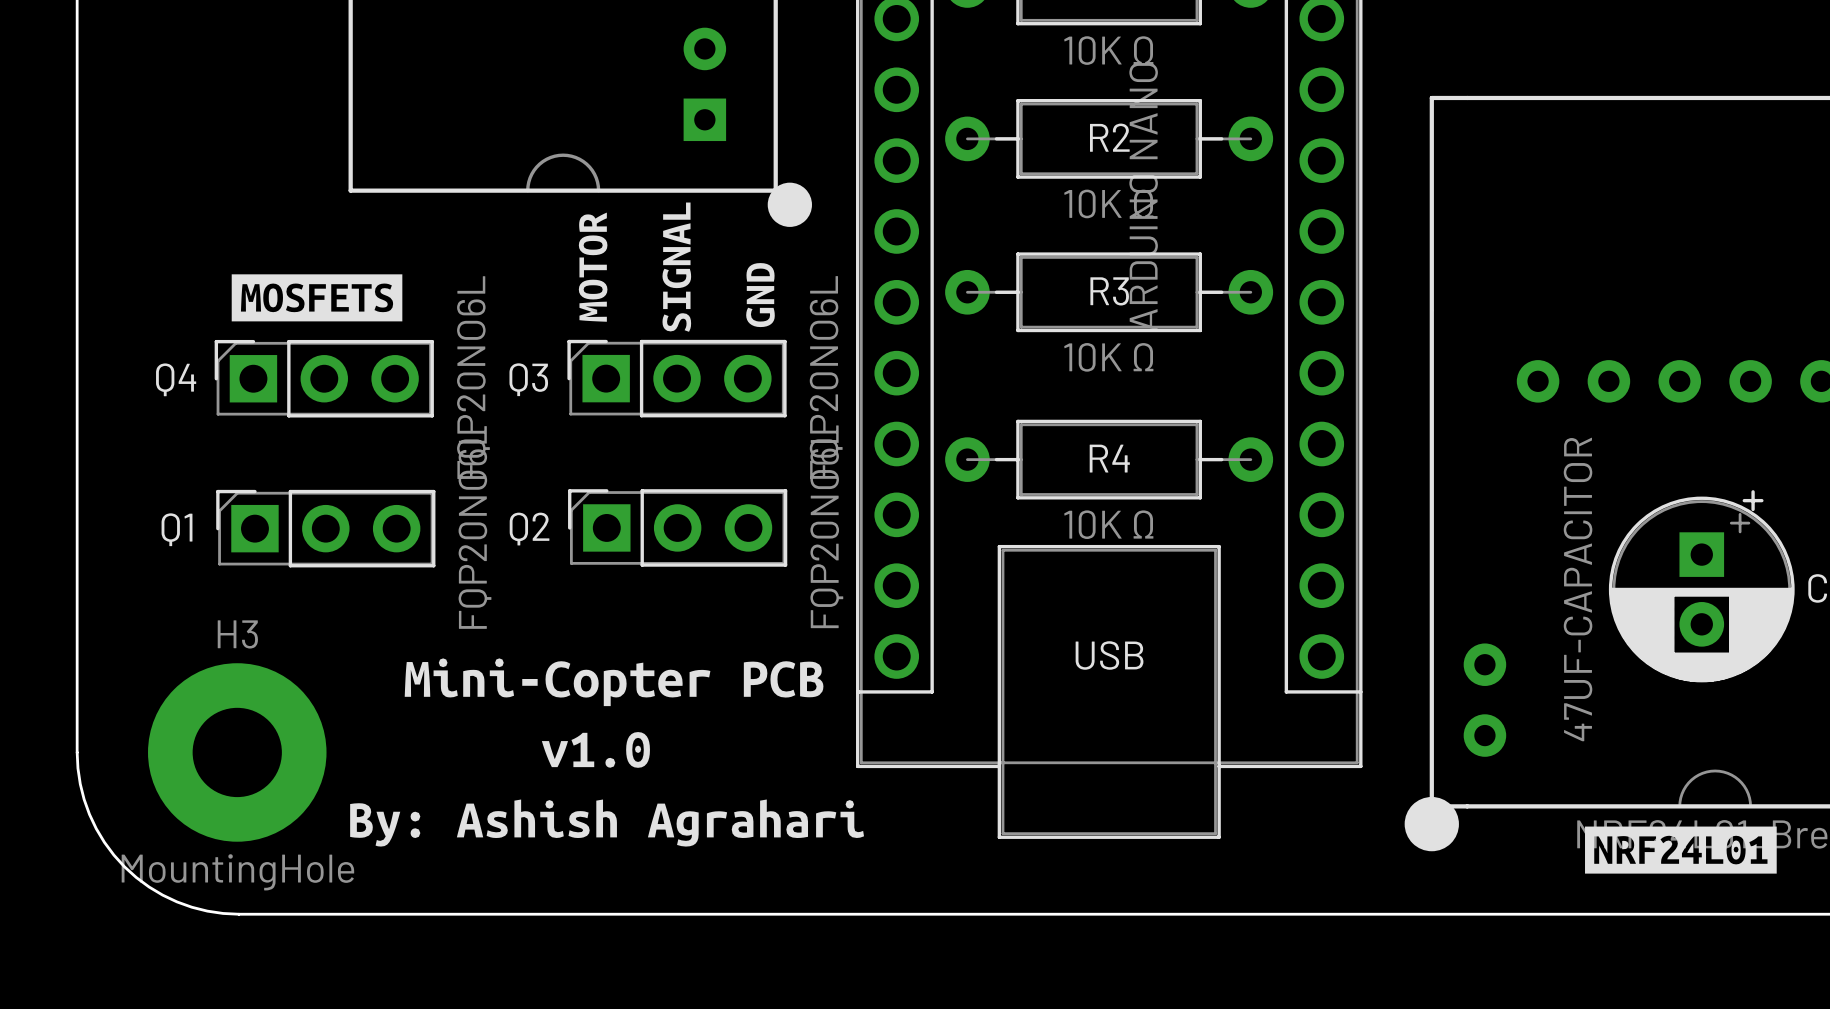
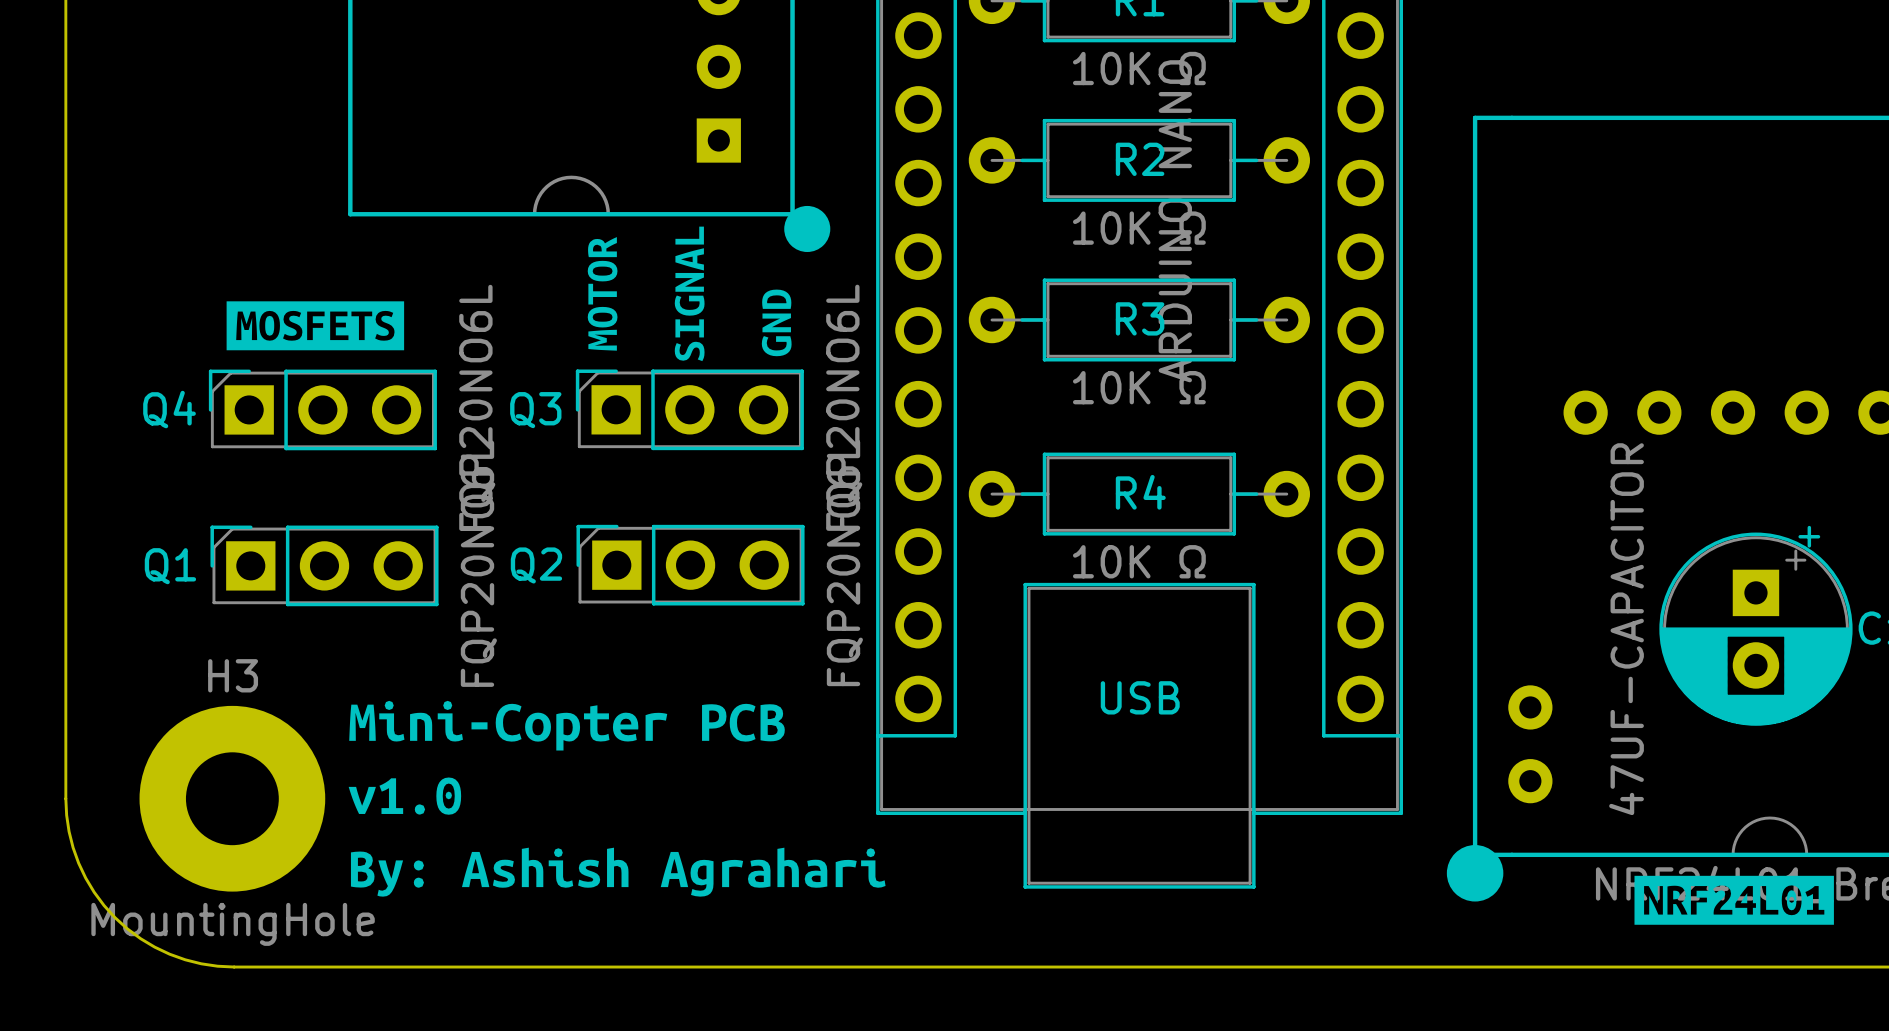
drawing shape: [350, 658, 865, 847] -> [348, 700, 886, 897]

